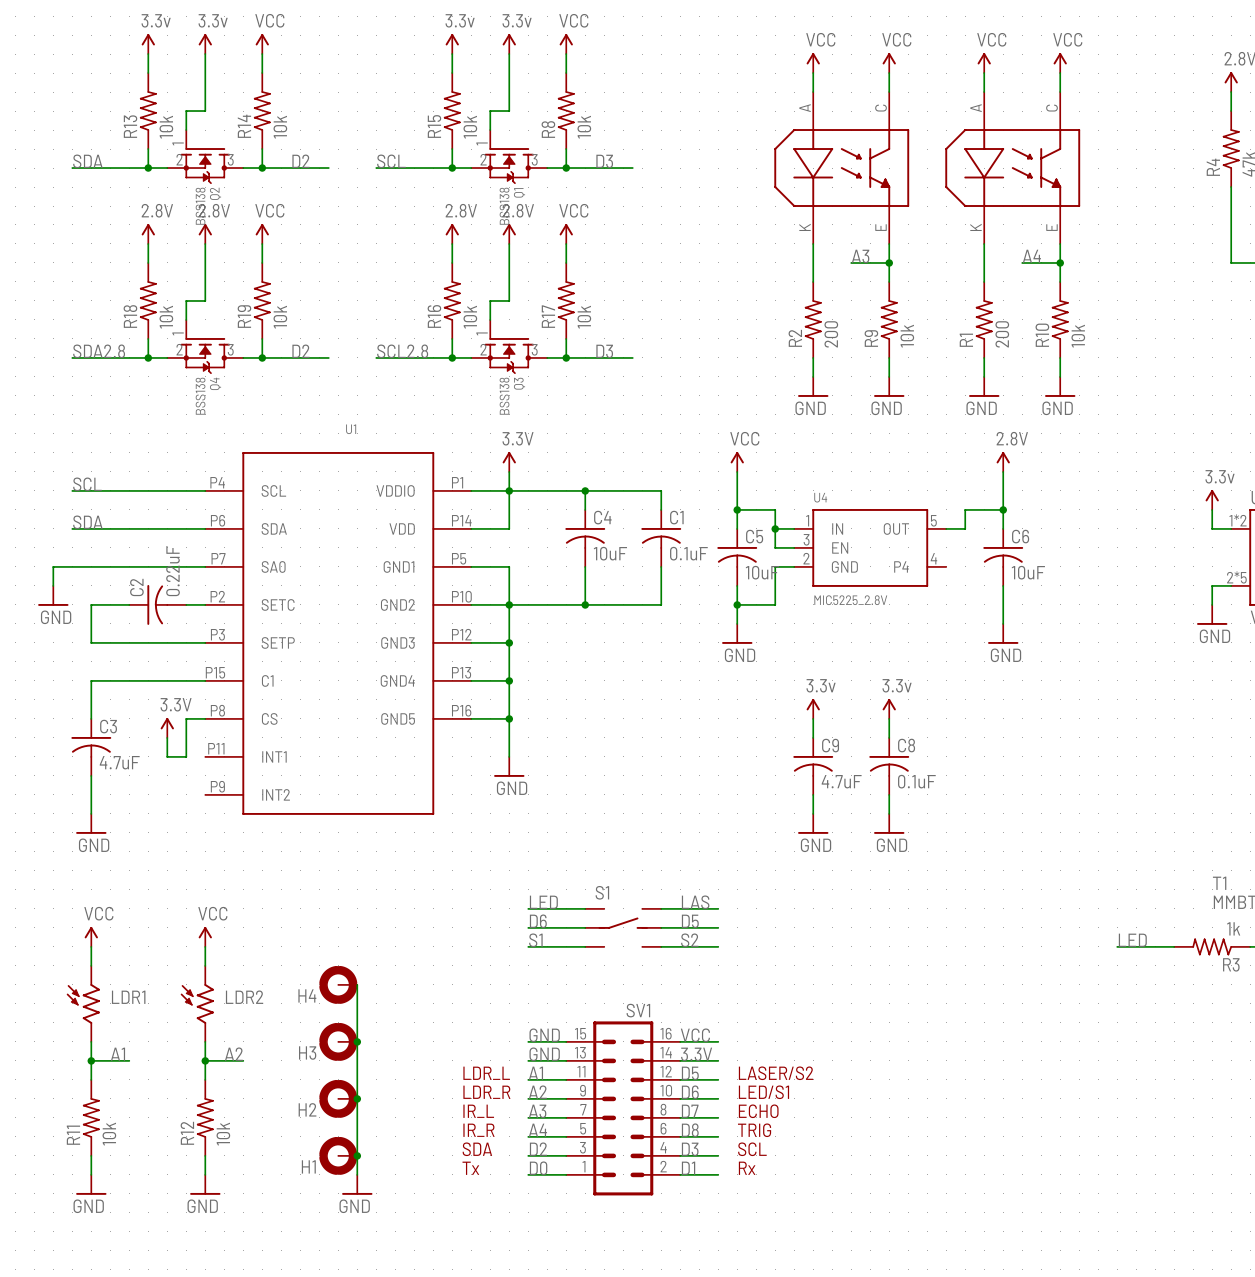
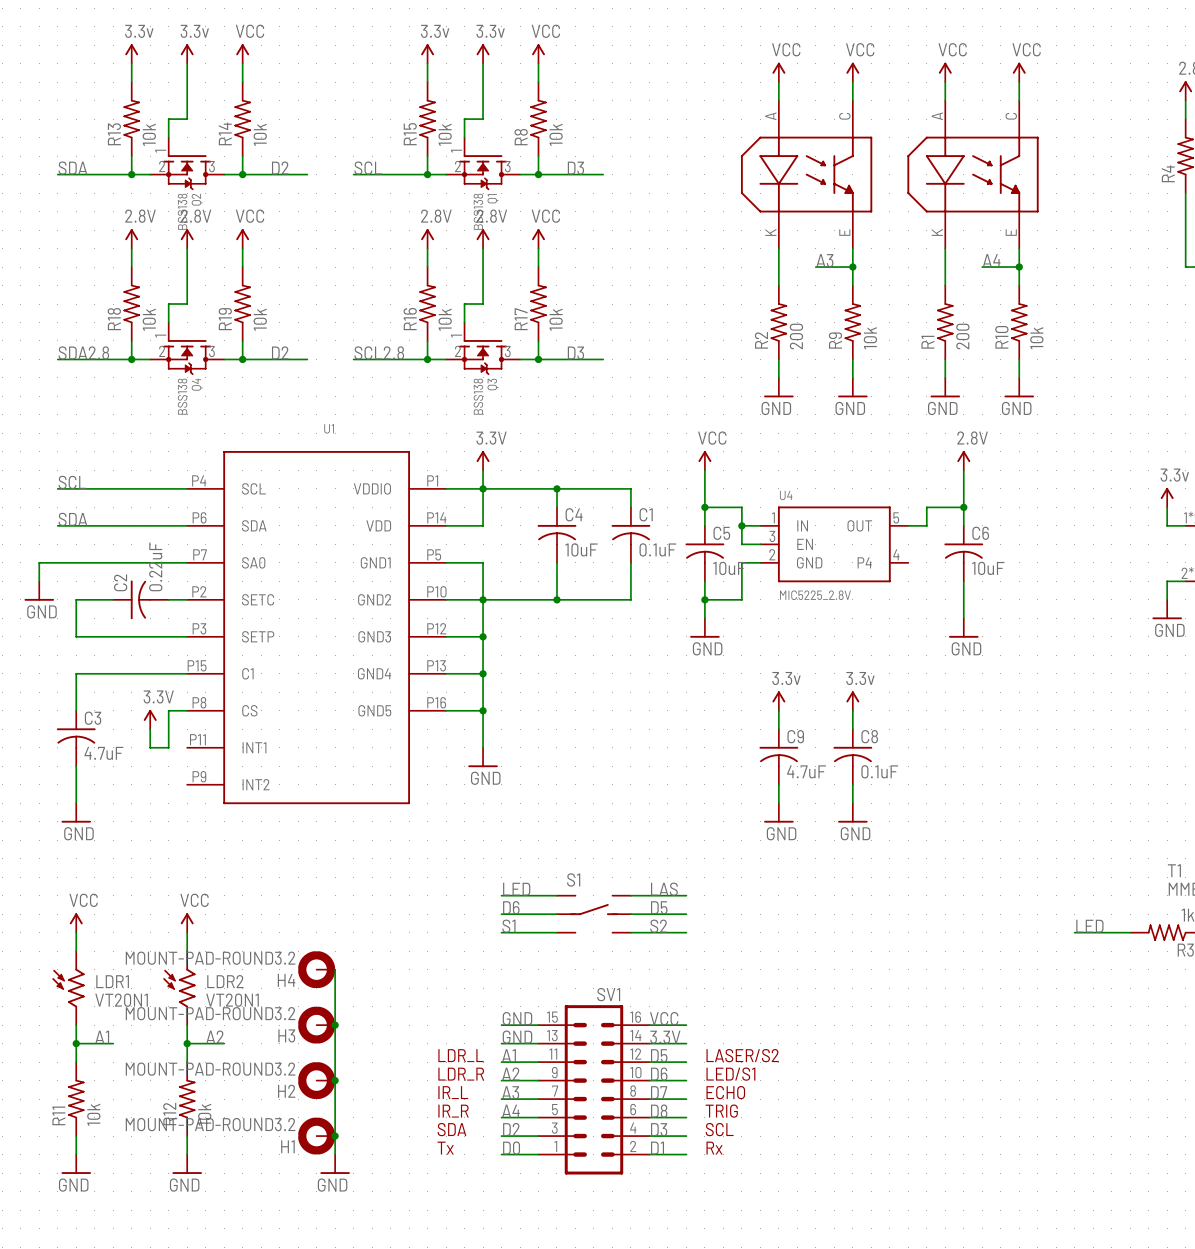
H4 value: none -> MOUNT-PAD-ROUND3.2 (210, 958)
LDR1 value: none -> VT20N1 (121, 1000)
LDR2 value: none -> VT20N1 (232, 1000)
H3 value: none -> MOUNT-PAD-ROUND3.2 (210, 1013)
H2 value: none -> MOUNT-PAD-ROUND3.2 (210, 1069)
H1 value: none -> MOUNT-PAD-ROUND3.2 (210, 1124)

